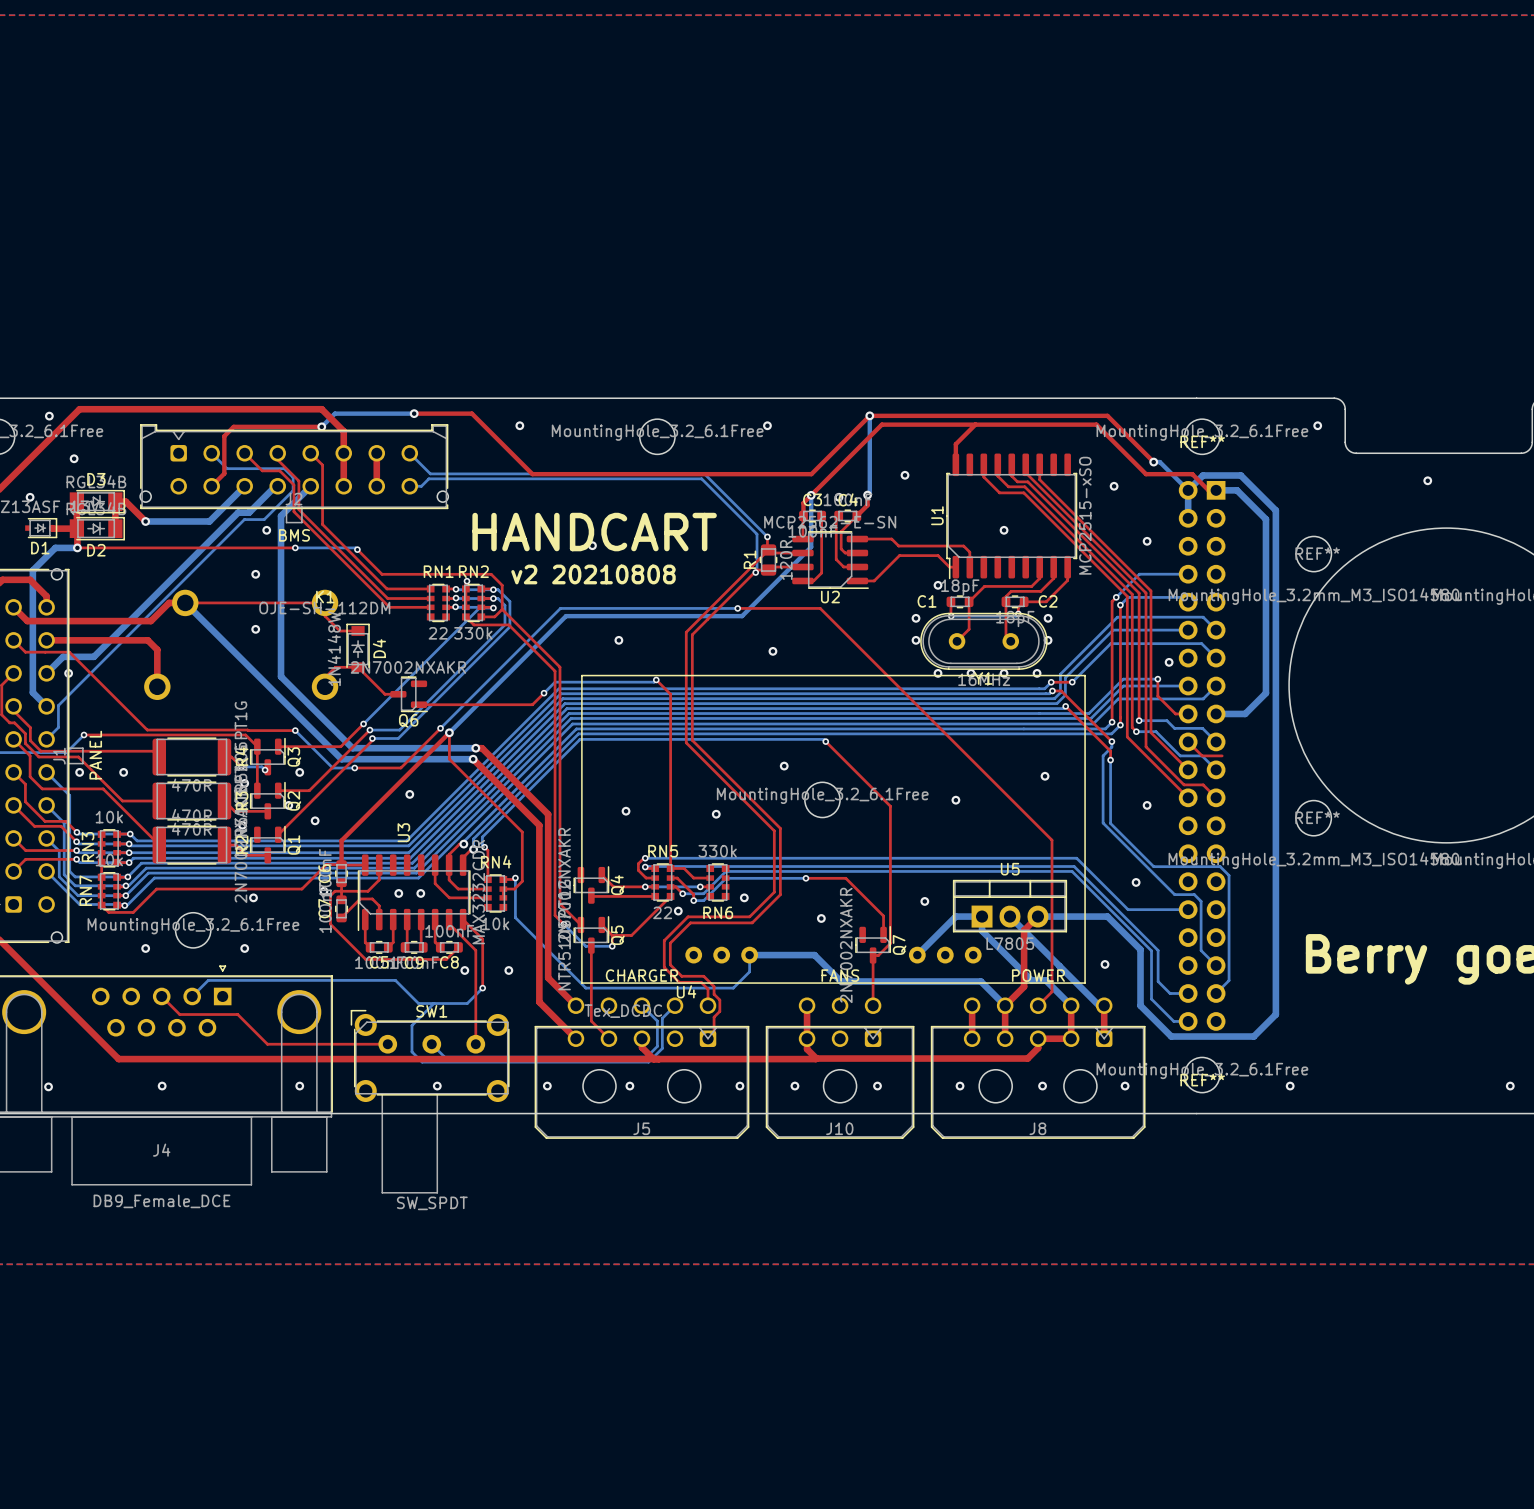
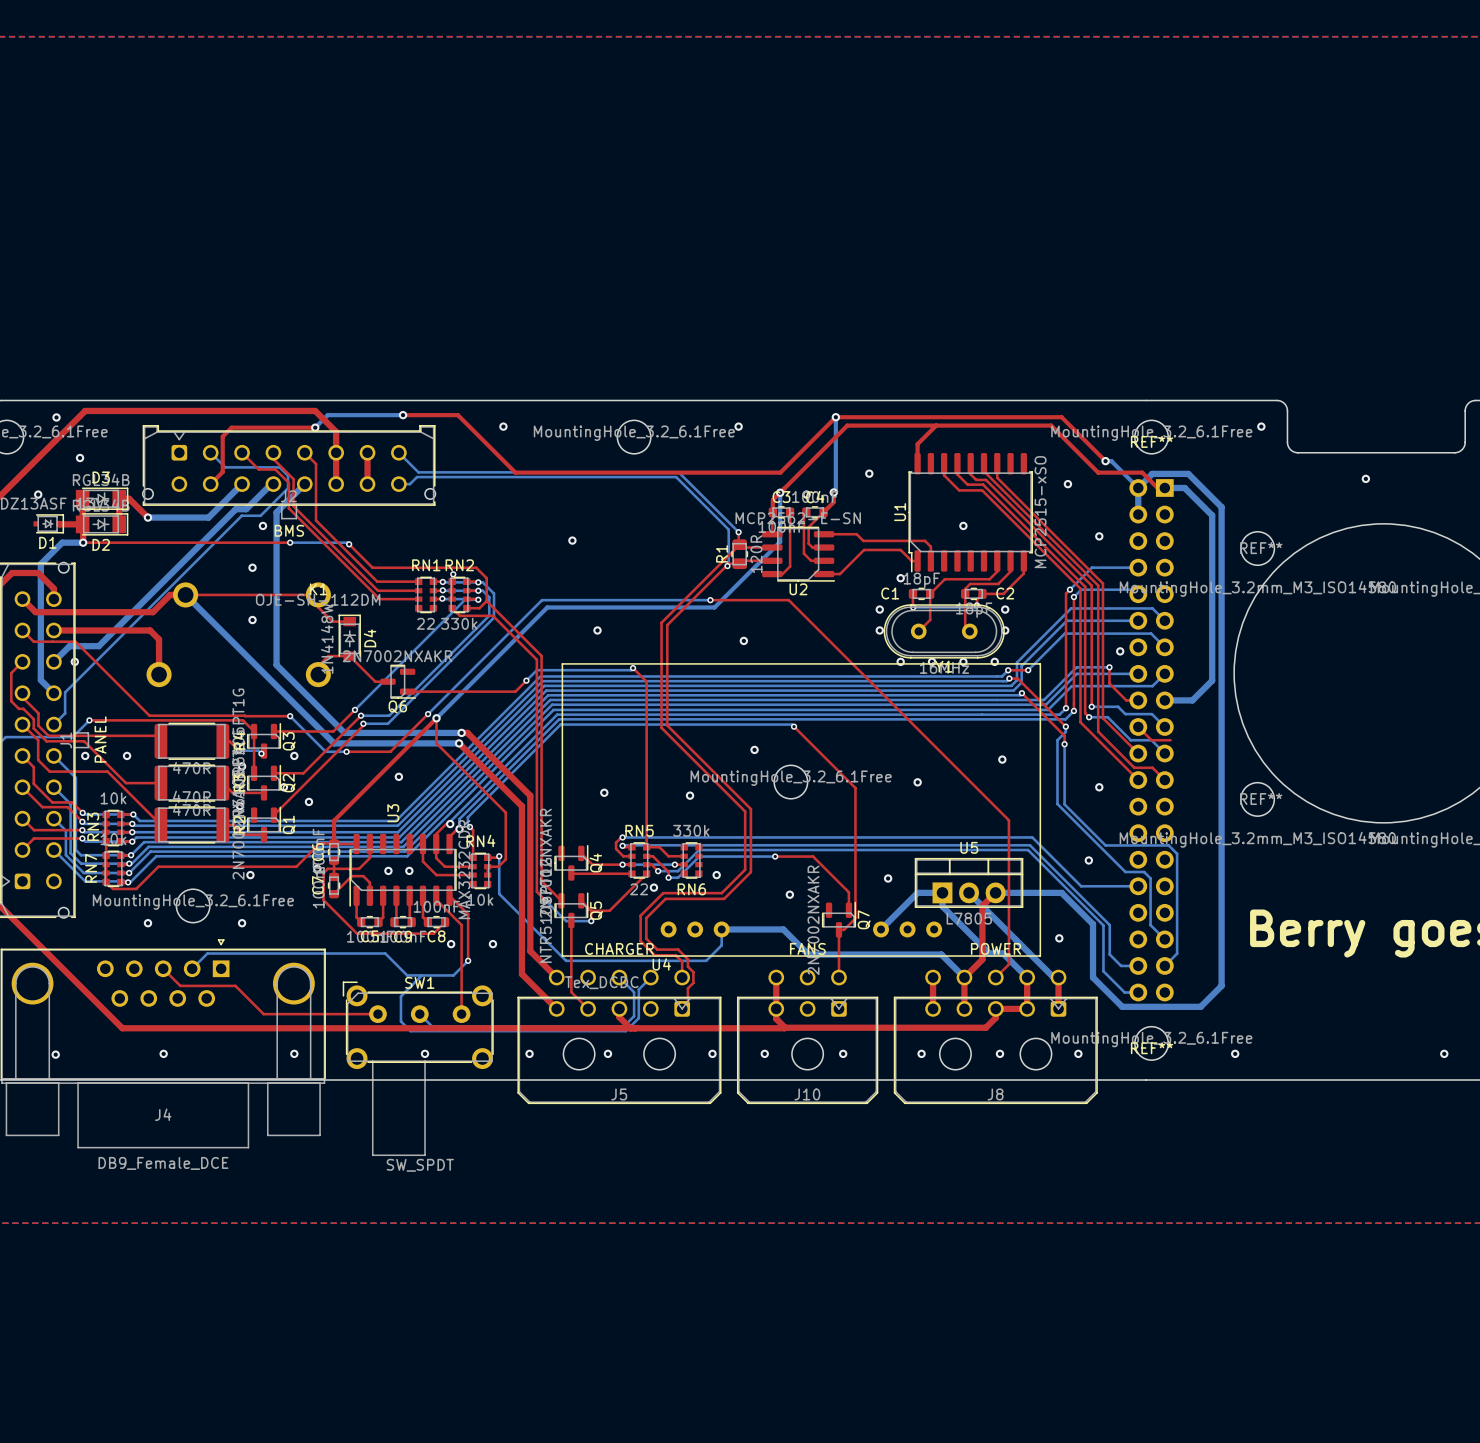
text: HANDCART (594, 532) -> none
text: v2 20210808 (593, 574) -> none

